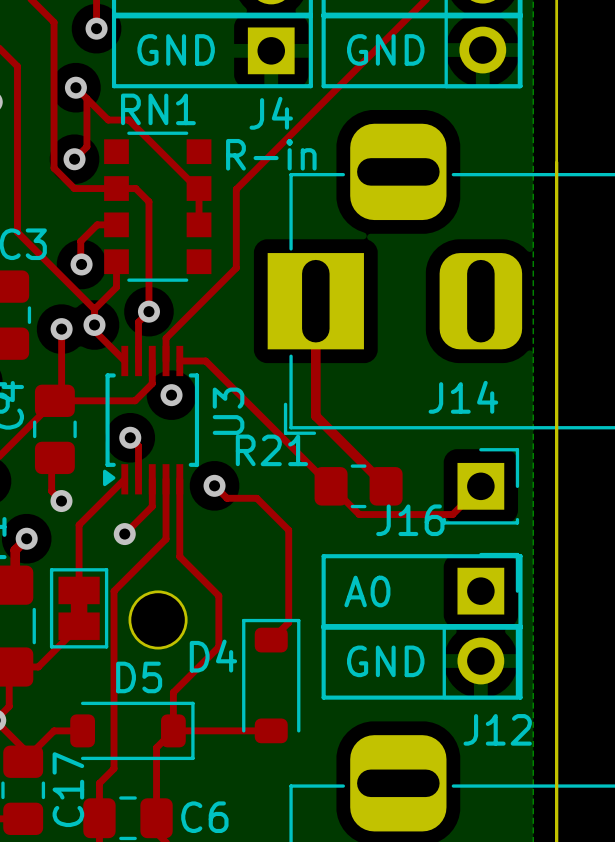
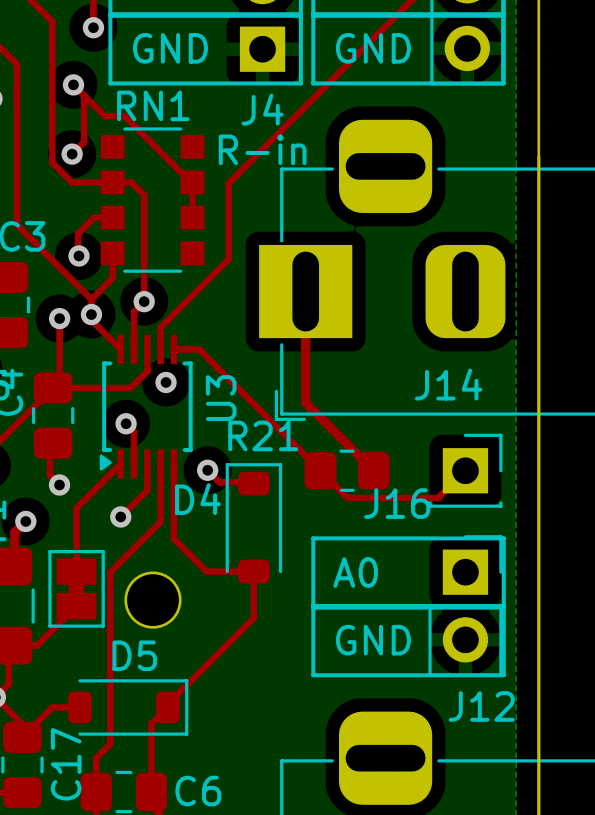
top track: (256, 498) (288, 530) (288, 622) (271, 640) -> none
top track: (213, 590) (218, 595) (218, 647) (173, 692) (173, 727) -> (206, 571) (253, 571) (253, 618) (167, 704)
D4 position: (271, 681) -> (253, 523)
top track: (173, 730) (271, 730) -> none

